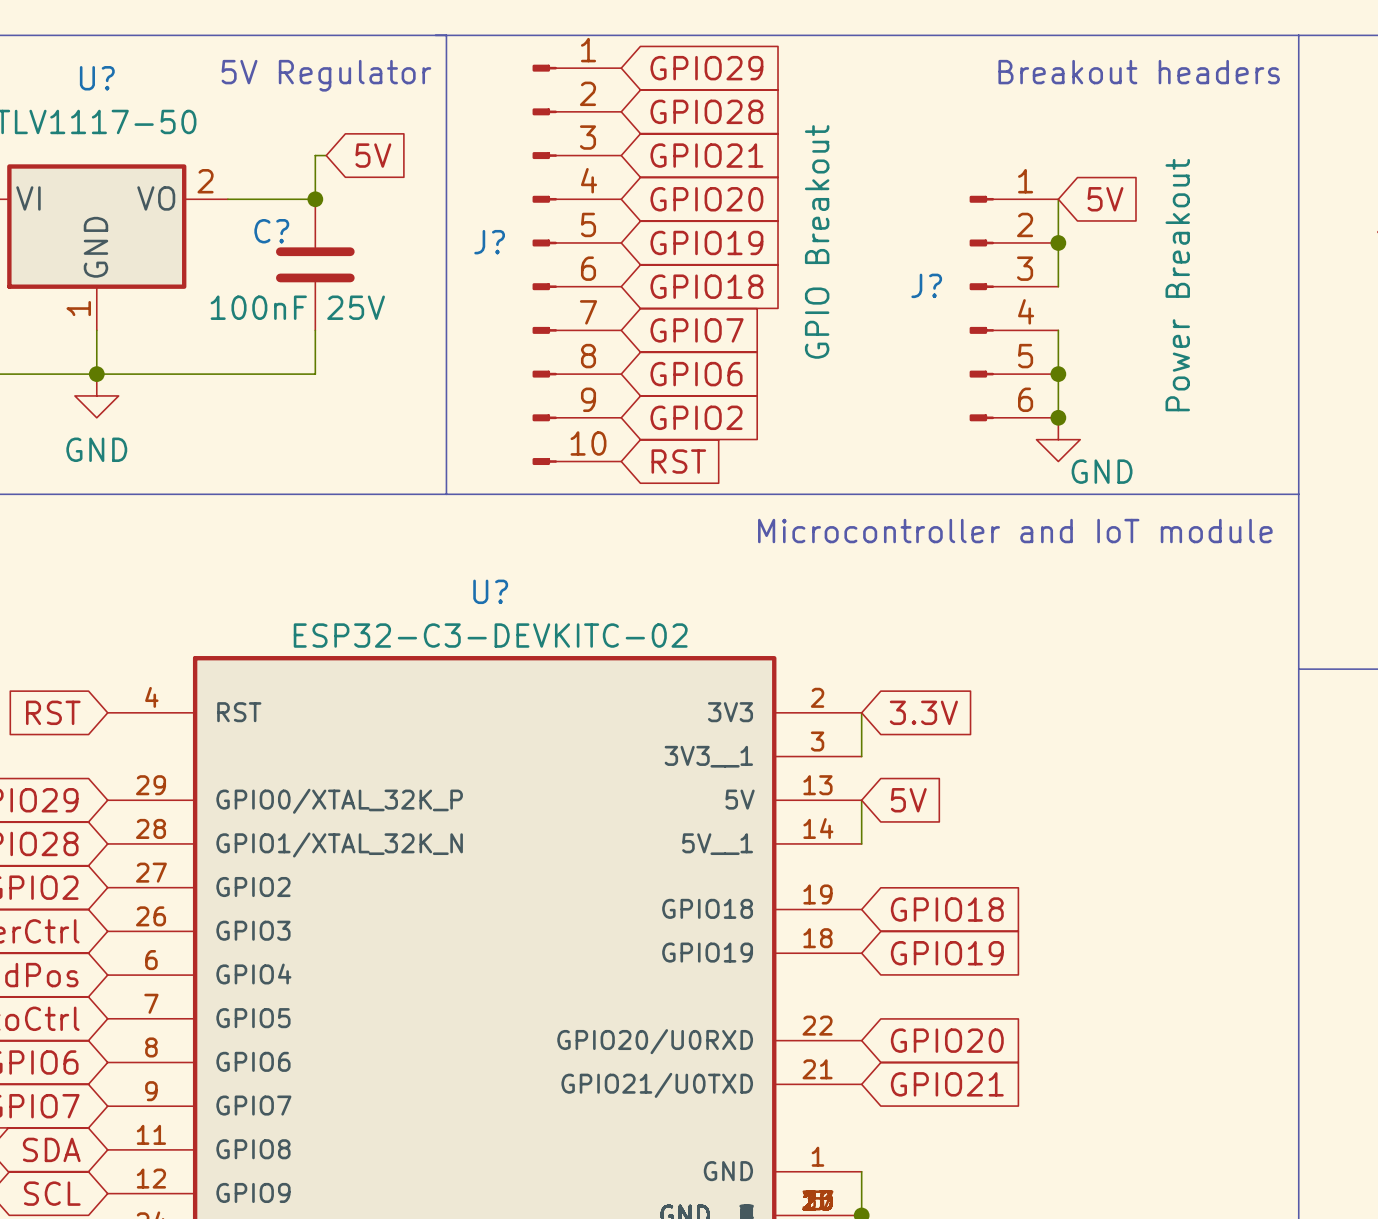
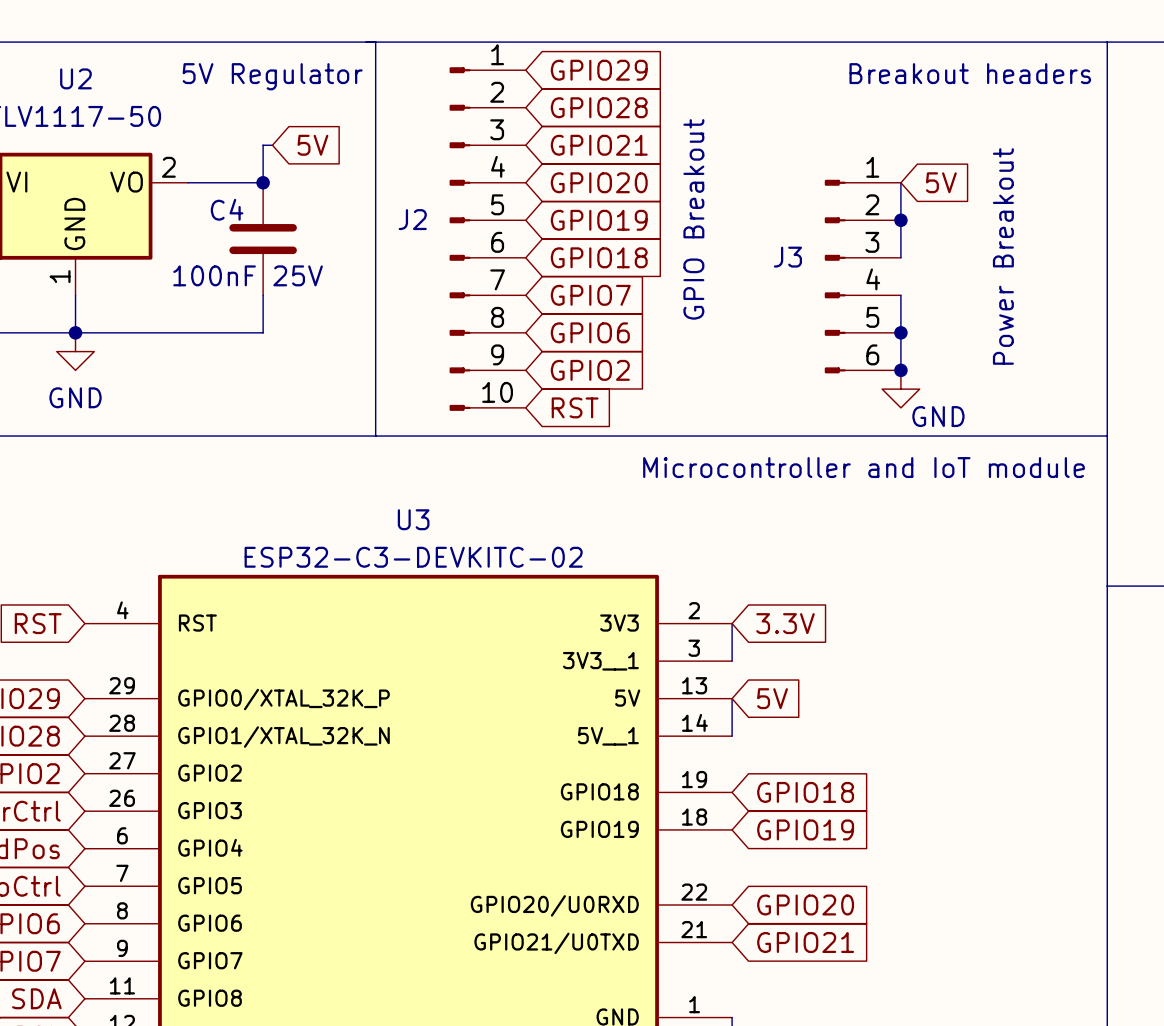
U? name: U? (97, 78) -> U2 (75, 78)
C? name: C? (271, 231) -> C4 (227, 209)
J? name: J? (489, 242) -> J2 (412, 219)
J? name: J? (926, 285) -> J3 (787, 257)
U? name: U? (490, 591) -> U3 (413, 519)

